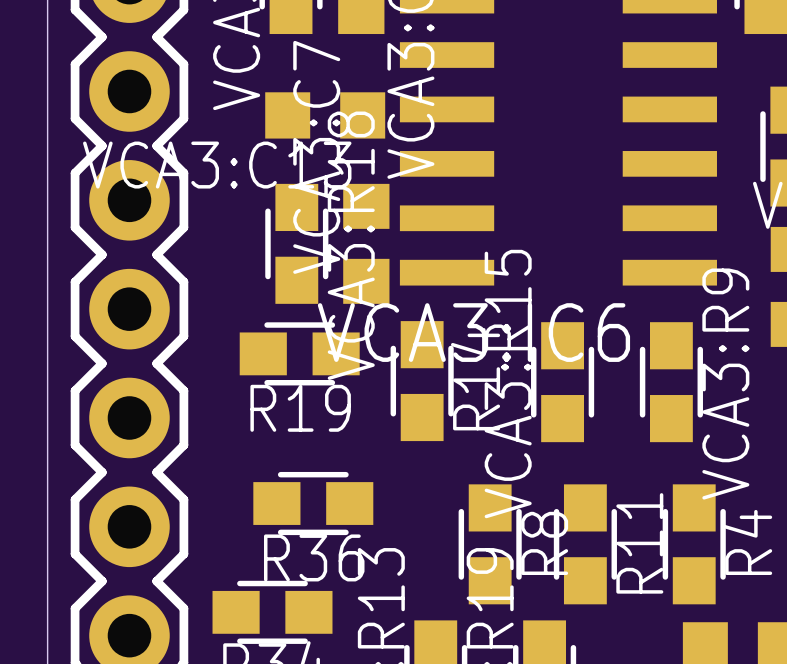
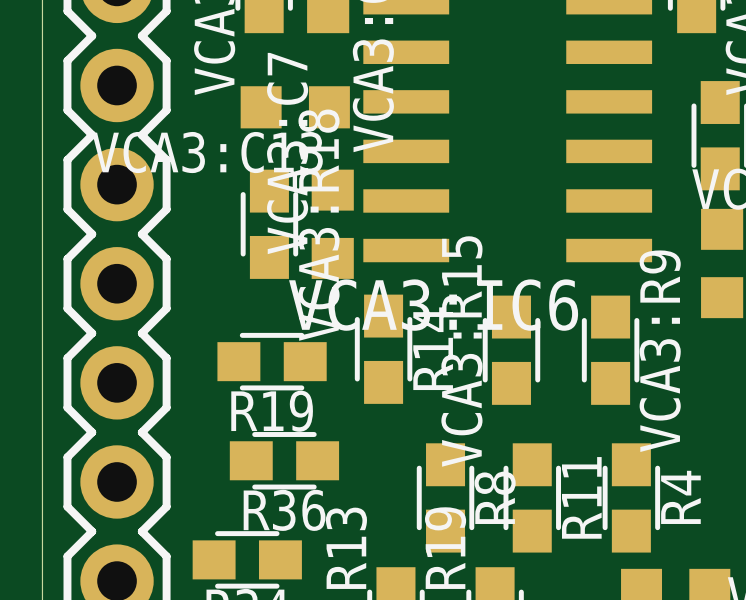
R19 position: (299, 353) -> (272, 361)

